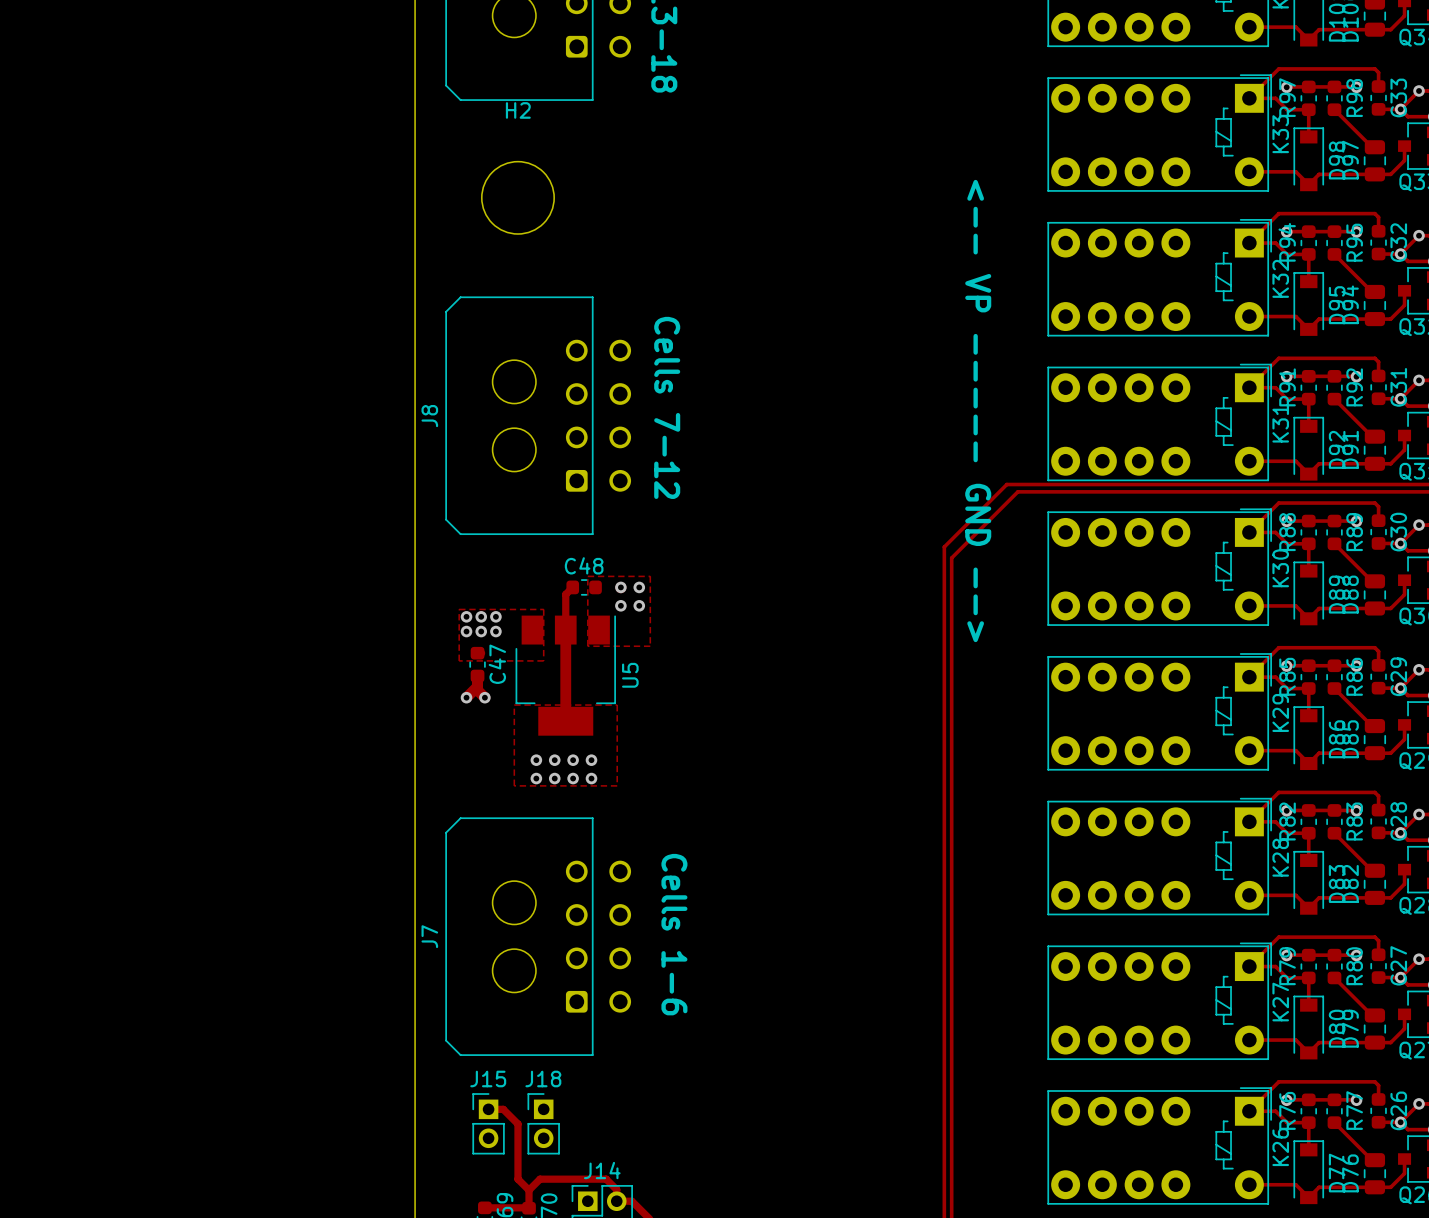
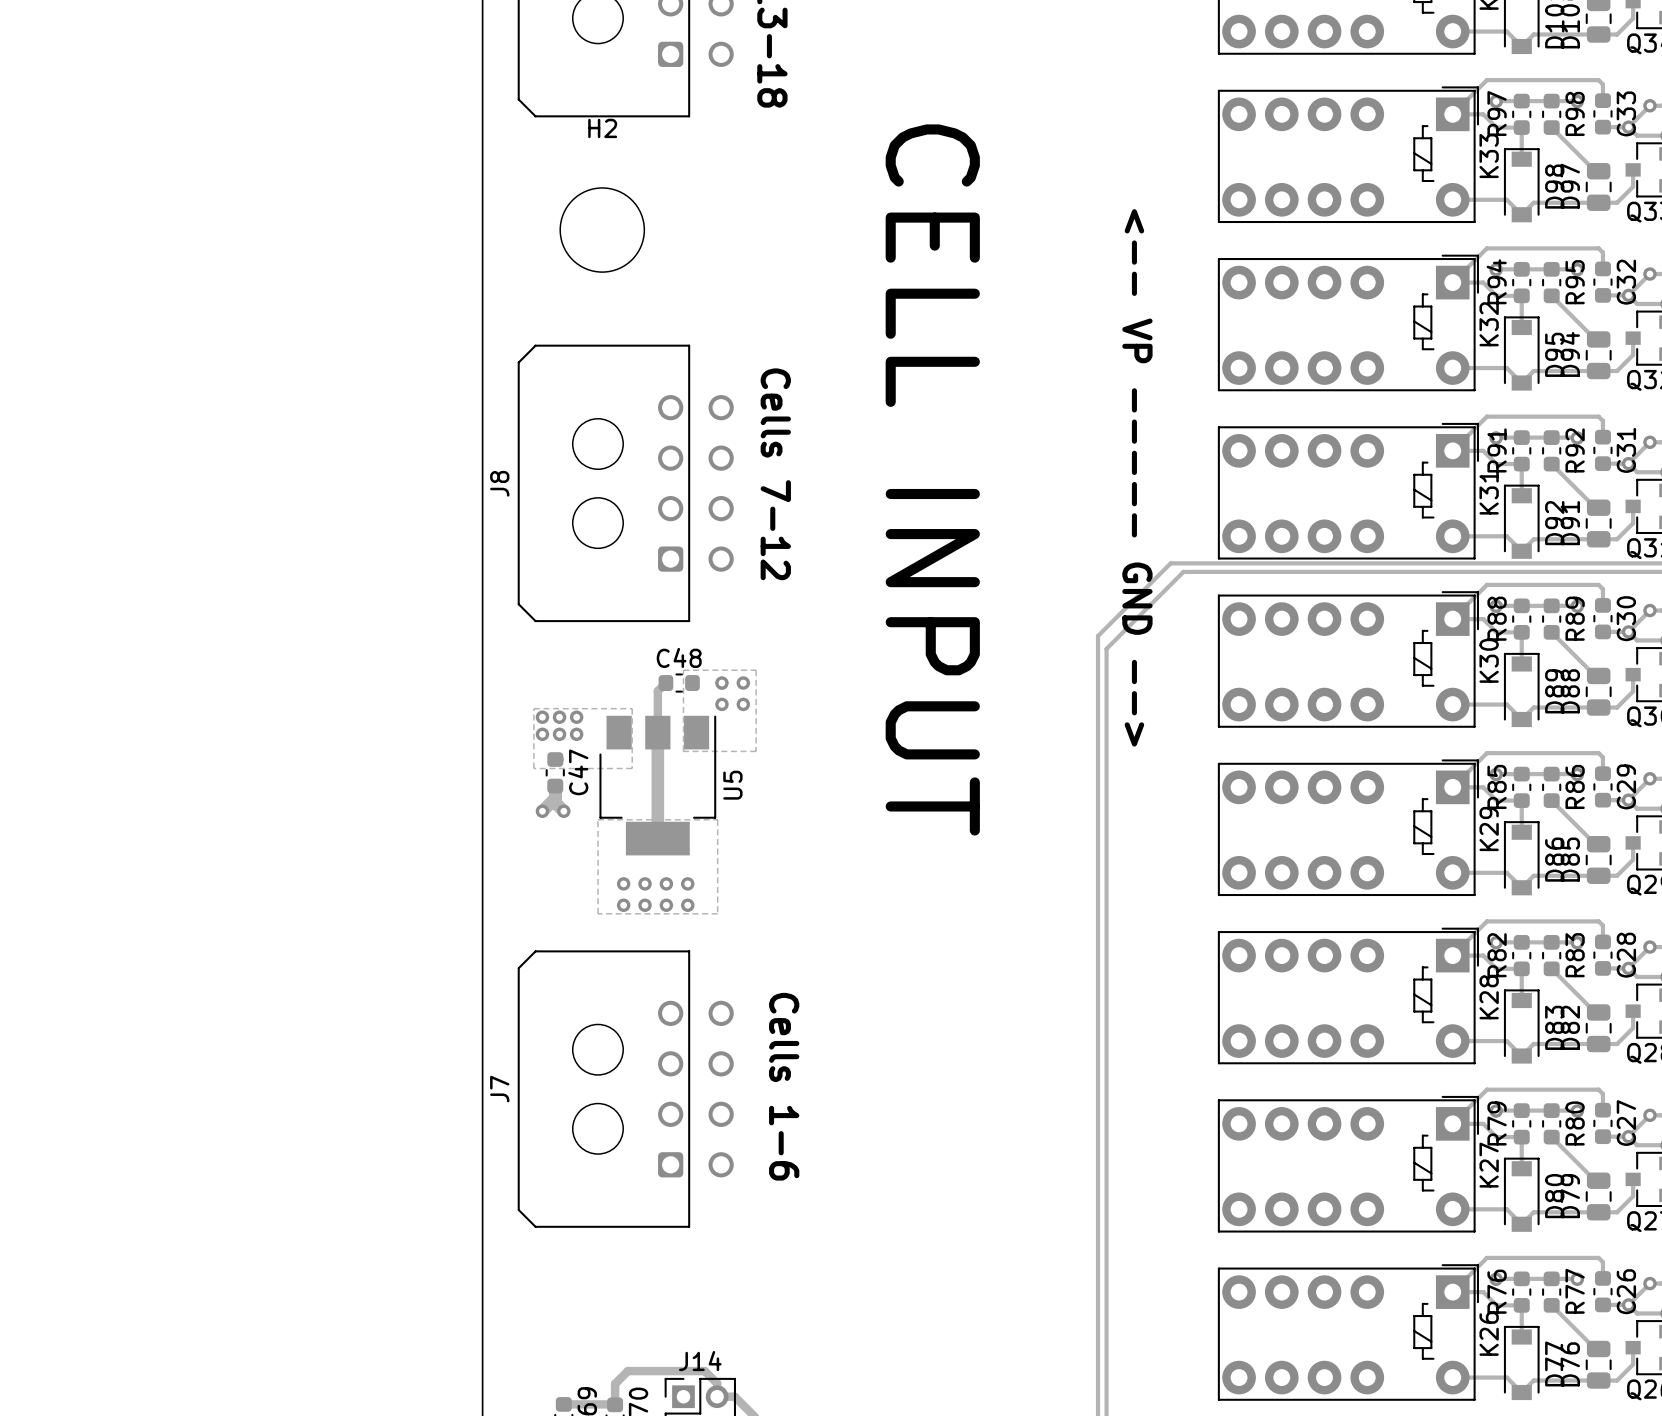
text: none -> CELL INPUT (932, 479)
track: (488, 1109) (503, 1109) (517, 1124) (517, 1179) (529, 1190) -> none
J15: (488, 1123) -> none
J18: (543, 1123) -> none

